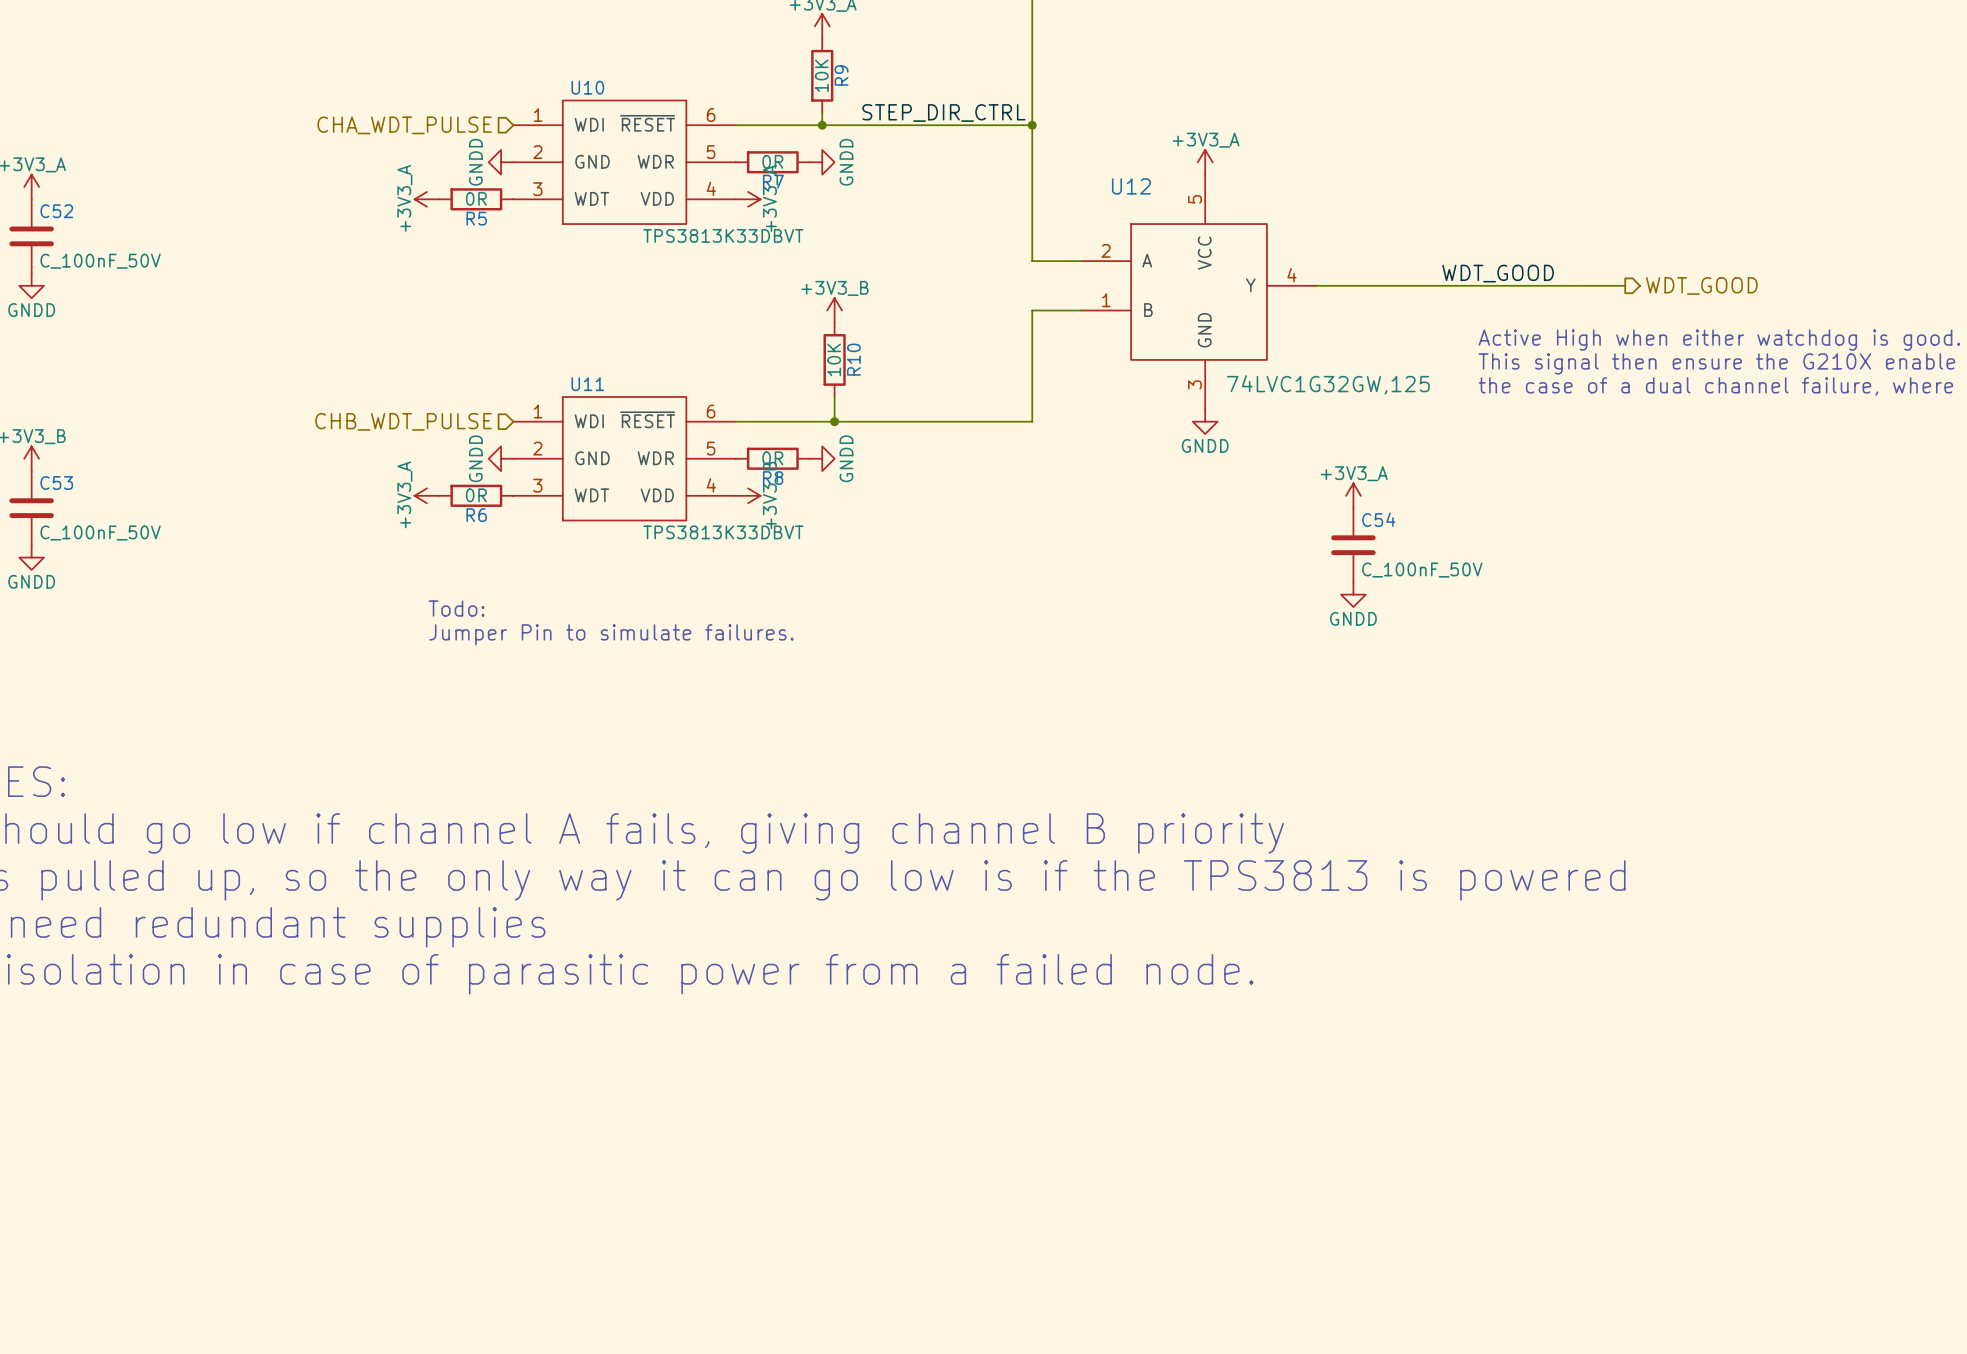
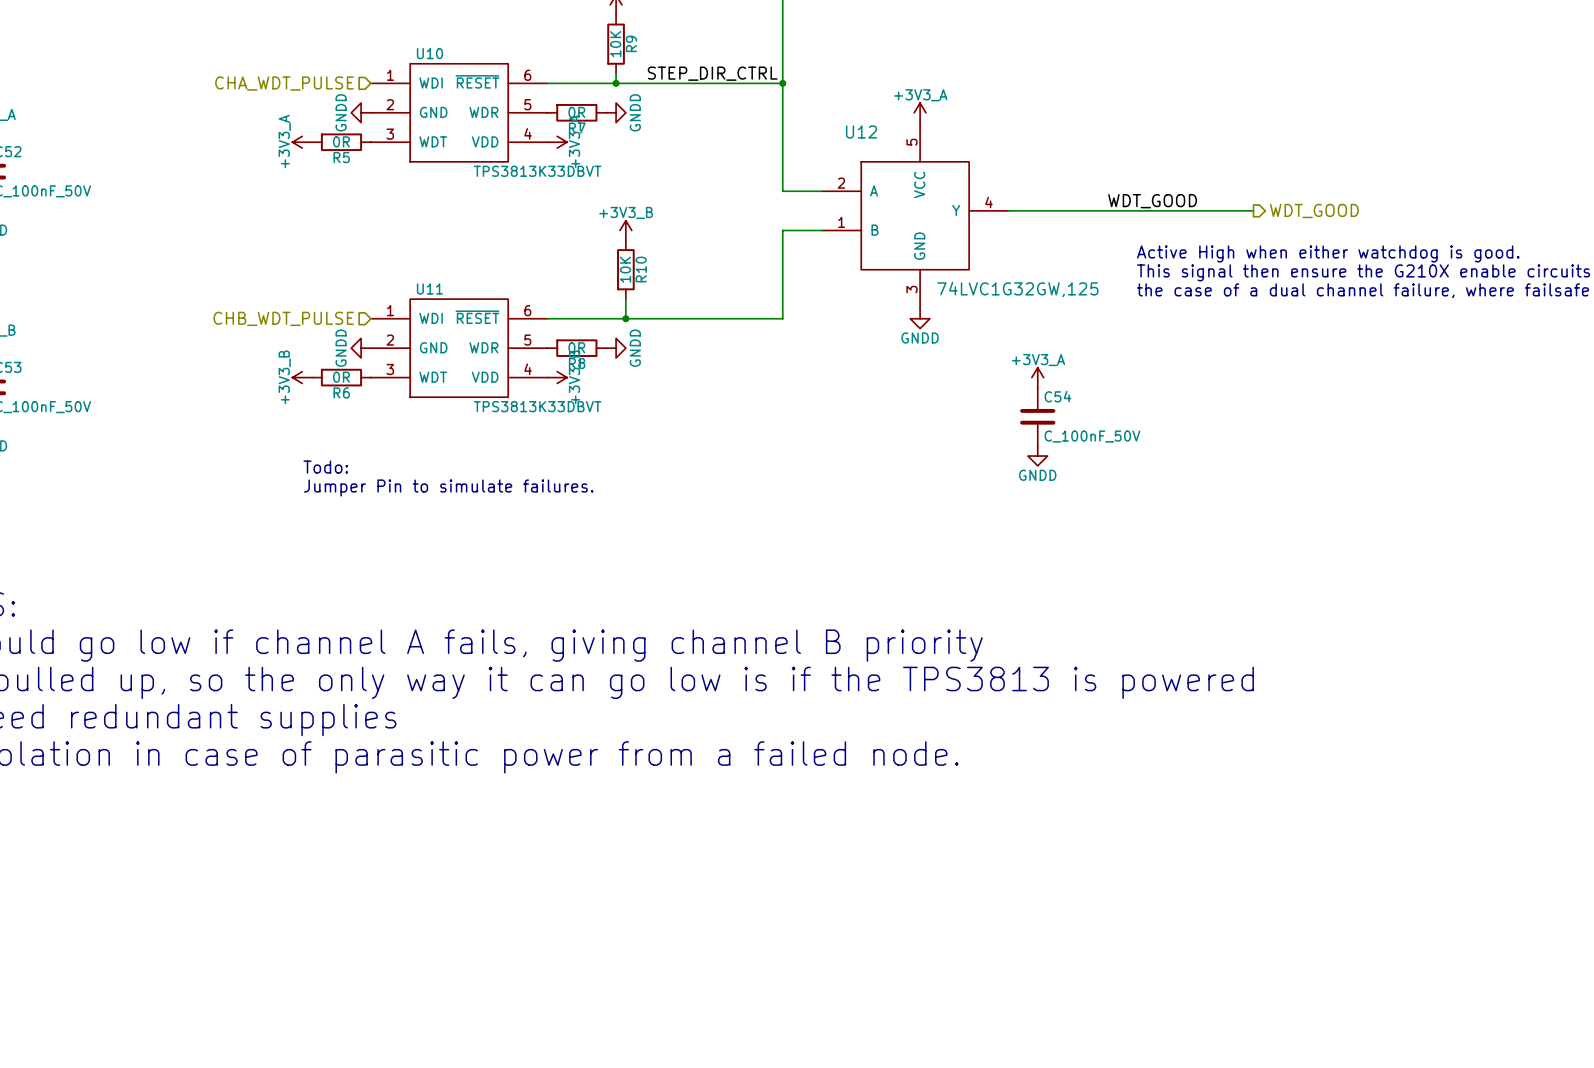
power symbol: +3V3_A (426, 495) -> +3V3_B (302, 377)

